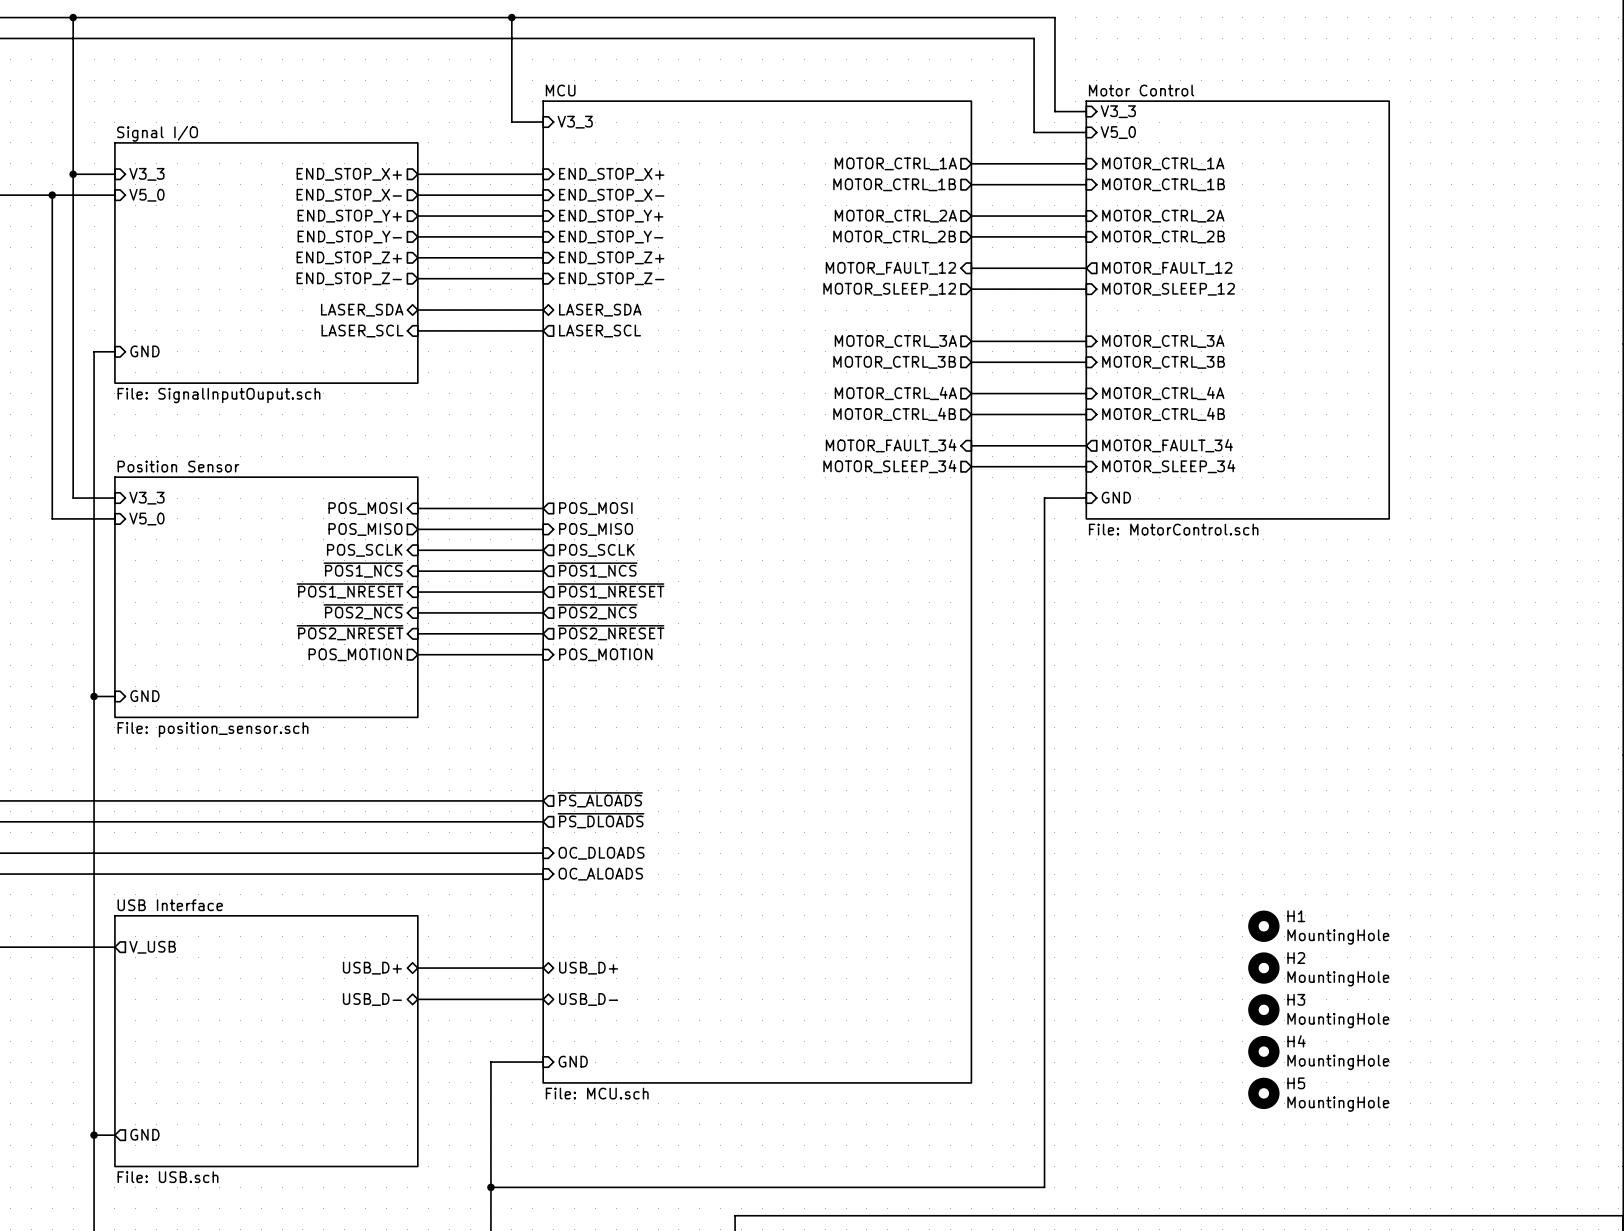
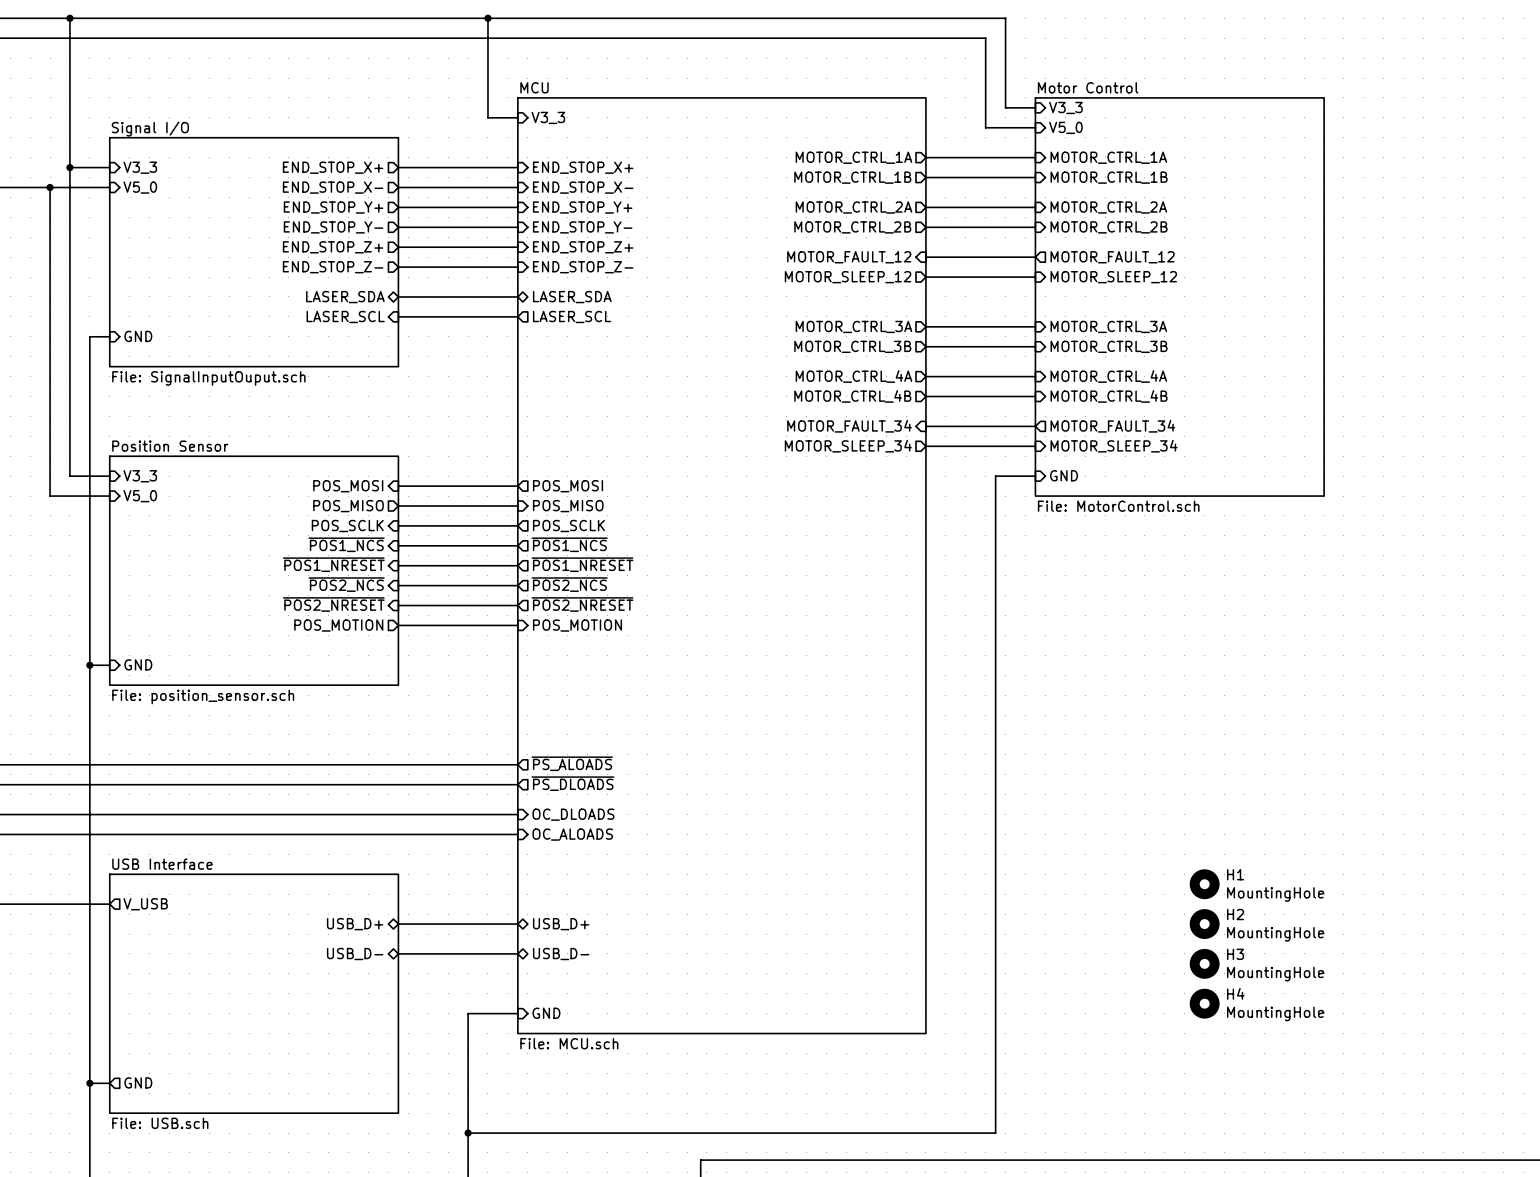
H5: MountingHole (1263, 1093) -> none

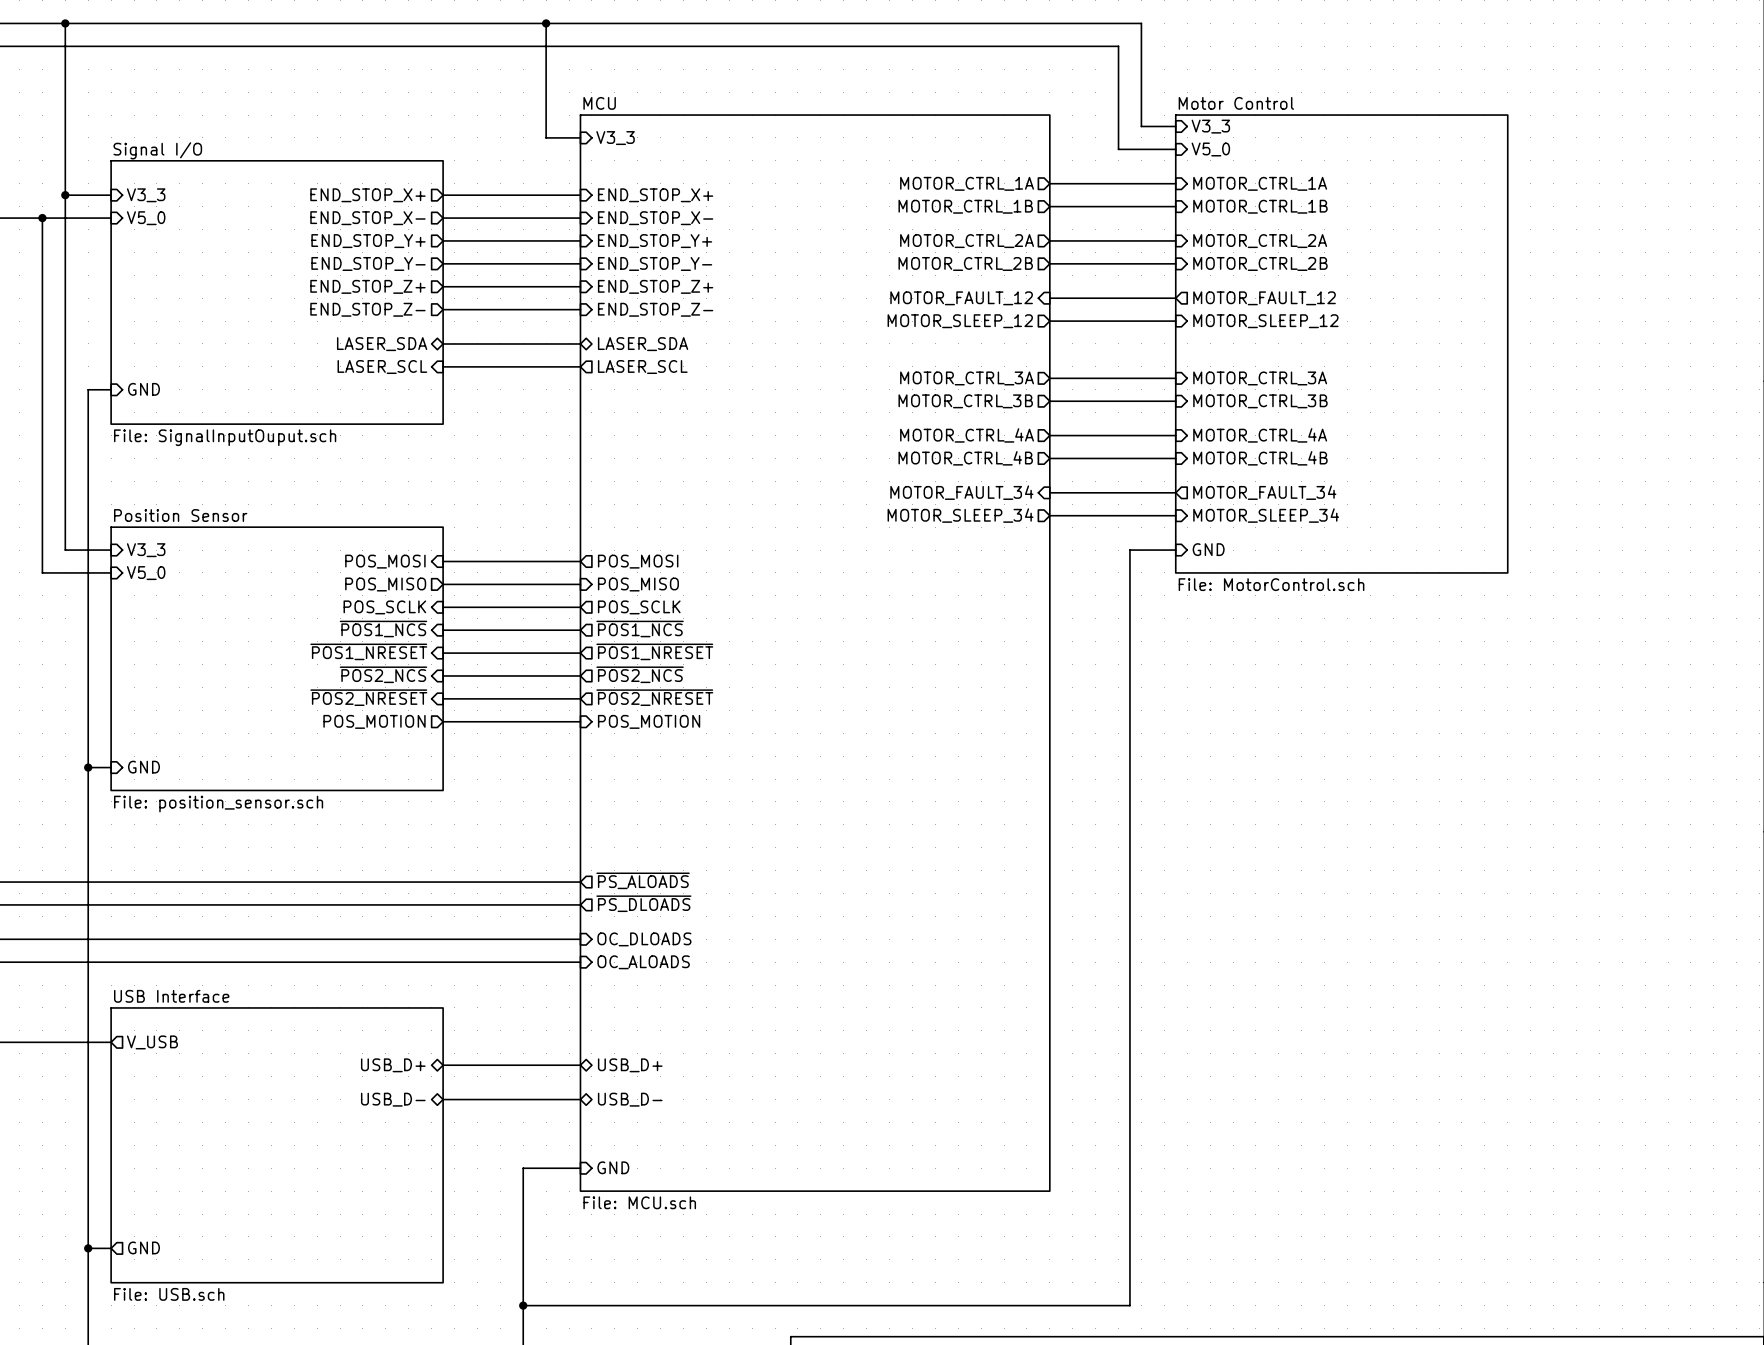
H1: MountingHole (1204, 884) -> none
H2: MountingHole (1204, 924) -> none
H3: MountingHole (1204, 963) -> none
H4: MountingHole (1204, 1003) -> none

